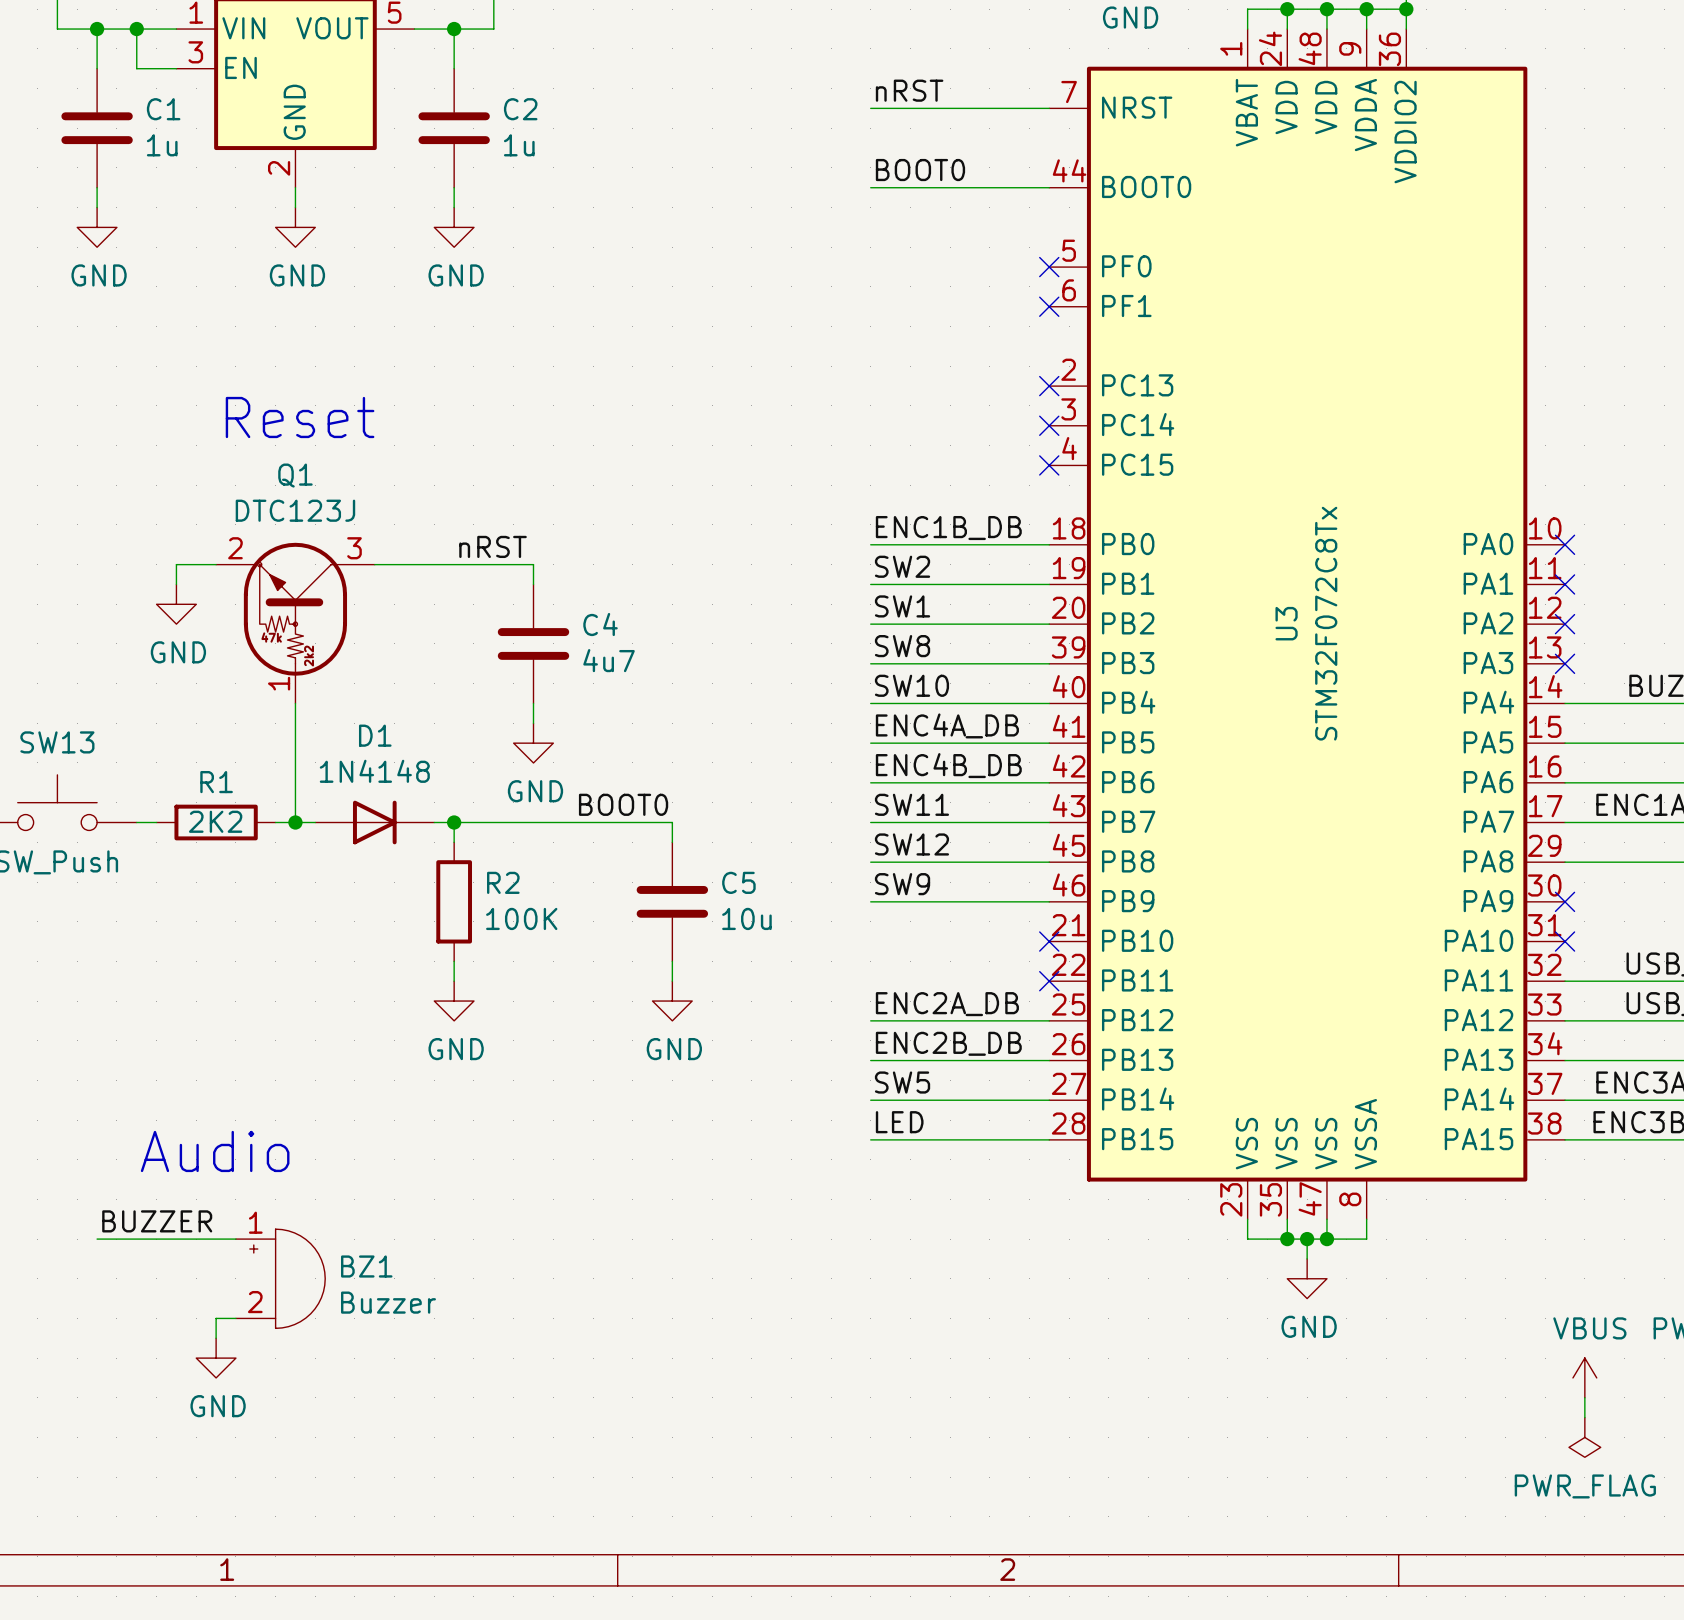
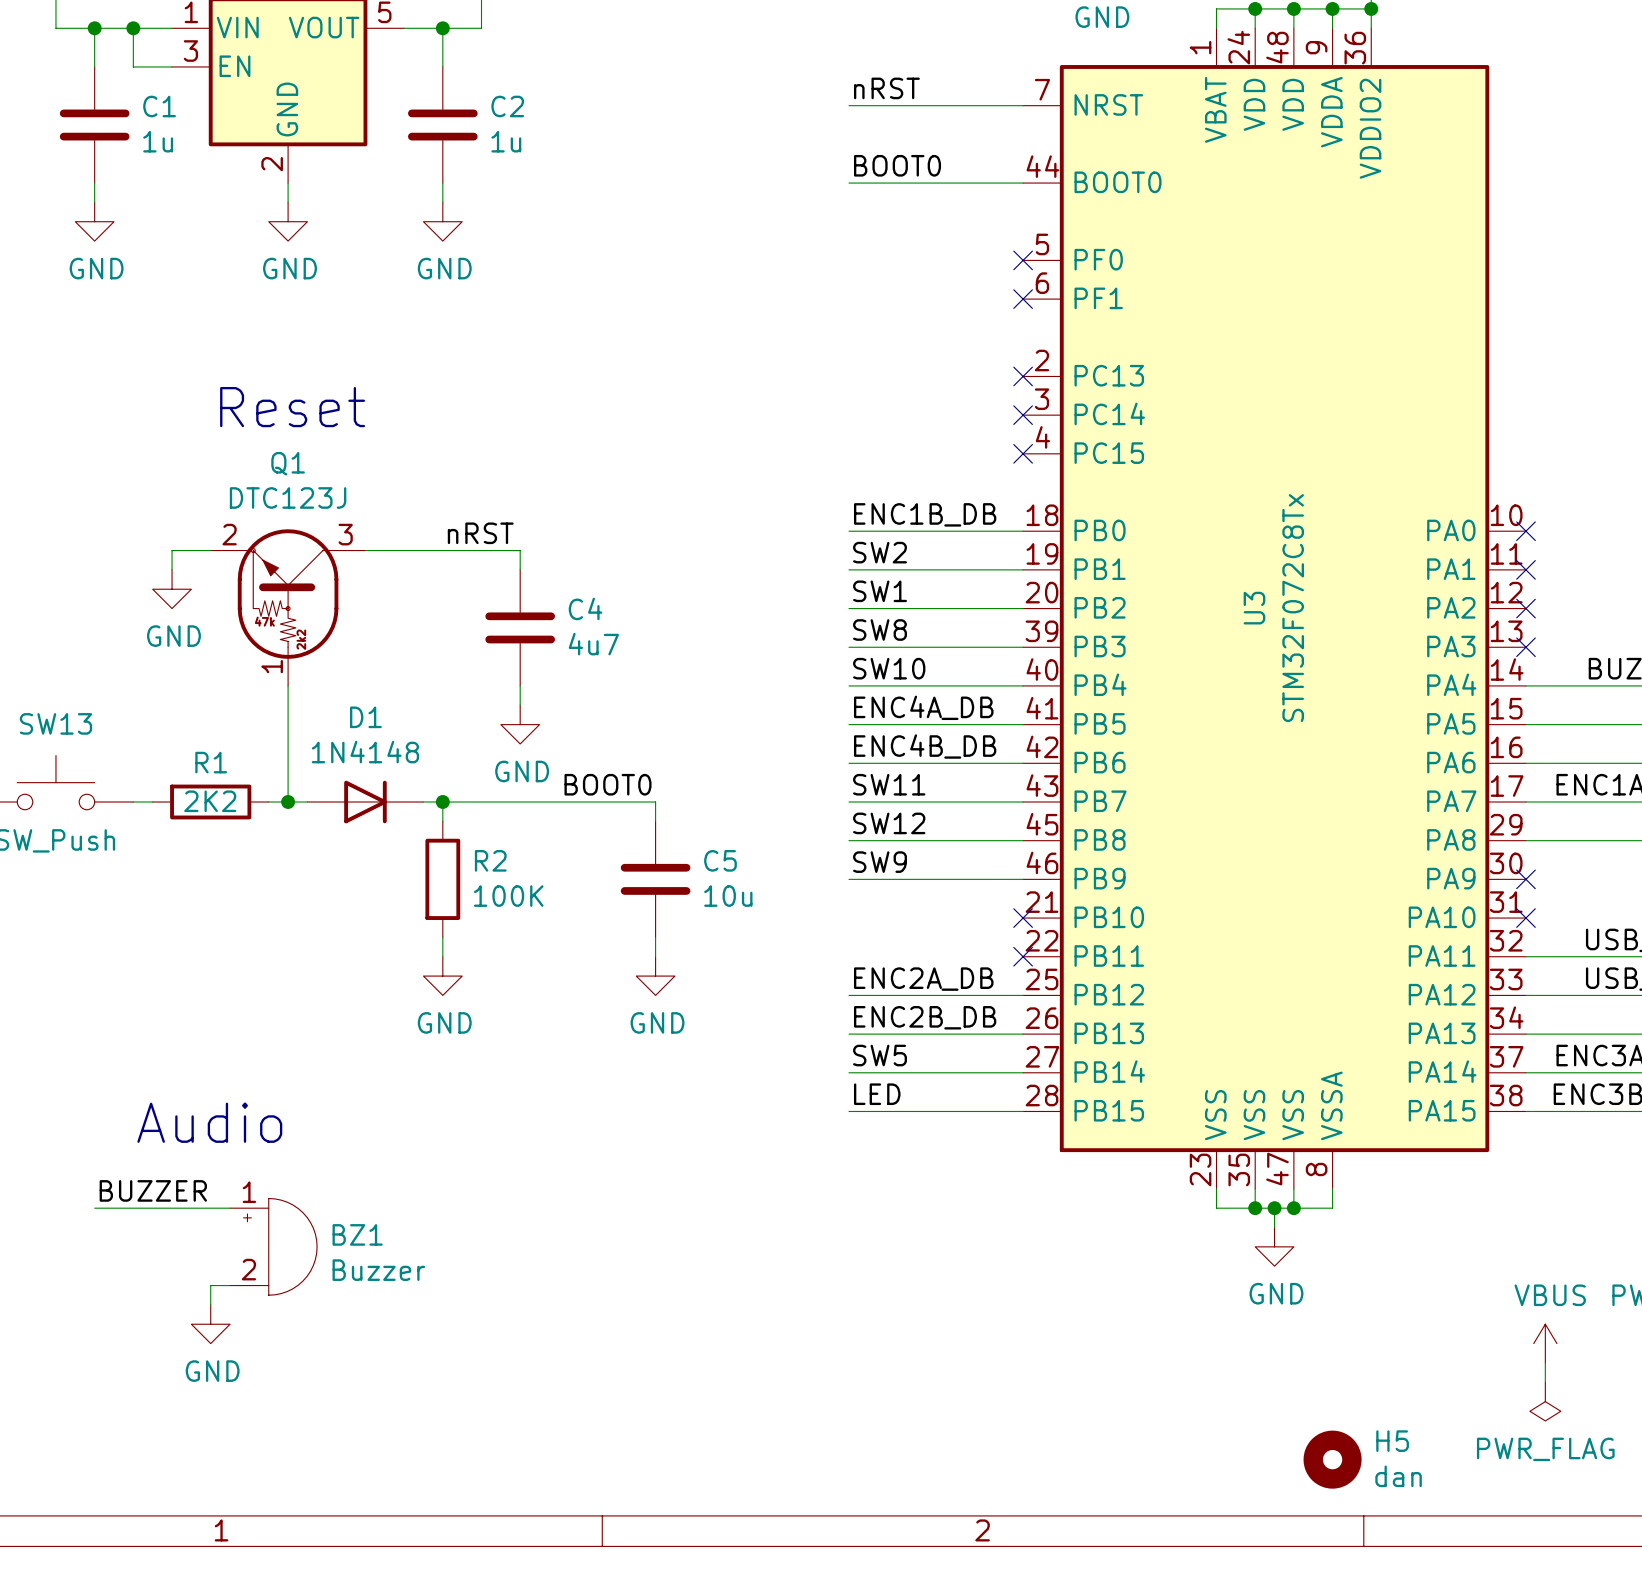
H5: none -> dan (1332, 1459)

